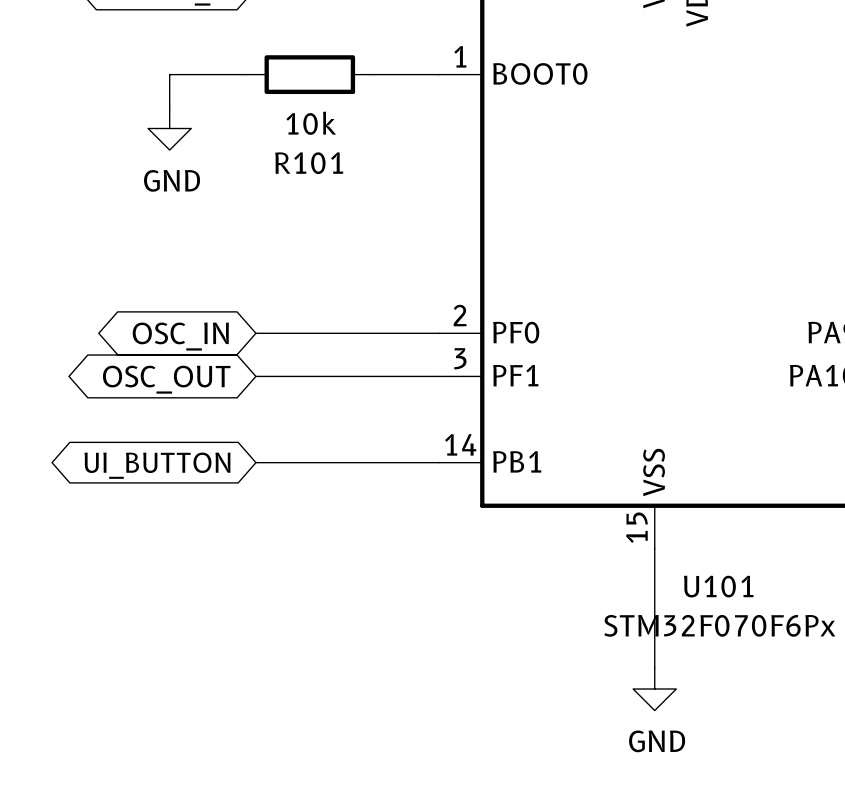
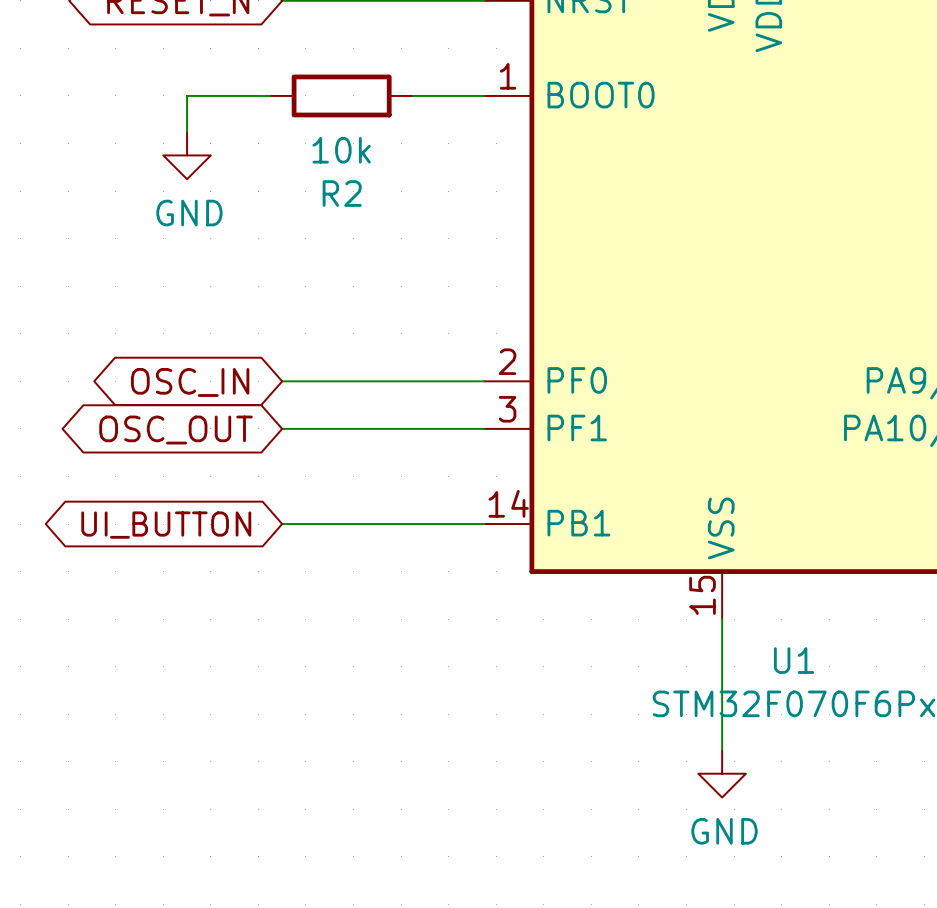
R101 name: R101 (309, 163) -> R2 (342, 193)
U101 name: U101 (718, 586) -> U1 (794, 660)

